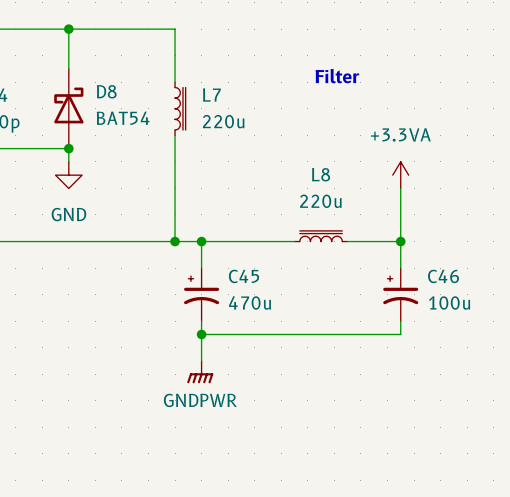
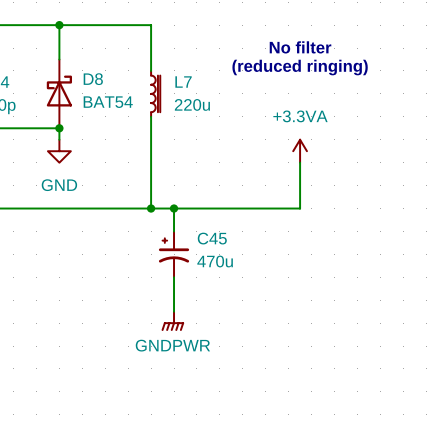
text: Filter (337, 76) -> No filter (300, 47)
text: none -> (reduced ringing) (300, 67)
power symbol position: +3.3VA (400, 175) -> +3.3VA (300, 151)
wire: none -> (300, 162) (300, 208) (254, 208)
wire: (400, 188) (400, 268) -> none
L8: 220u (321, 236) -> none
wire: (347, 241) (400, 241) -> none
junction: (400, 241) -> none
C46: 100u (400, 294) -> none
wire: (400, 321) (400, 334) (201, 334) -> none
junction: (201, 334) -> none

